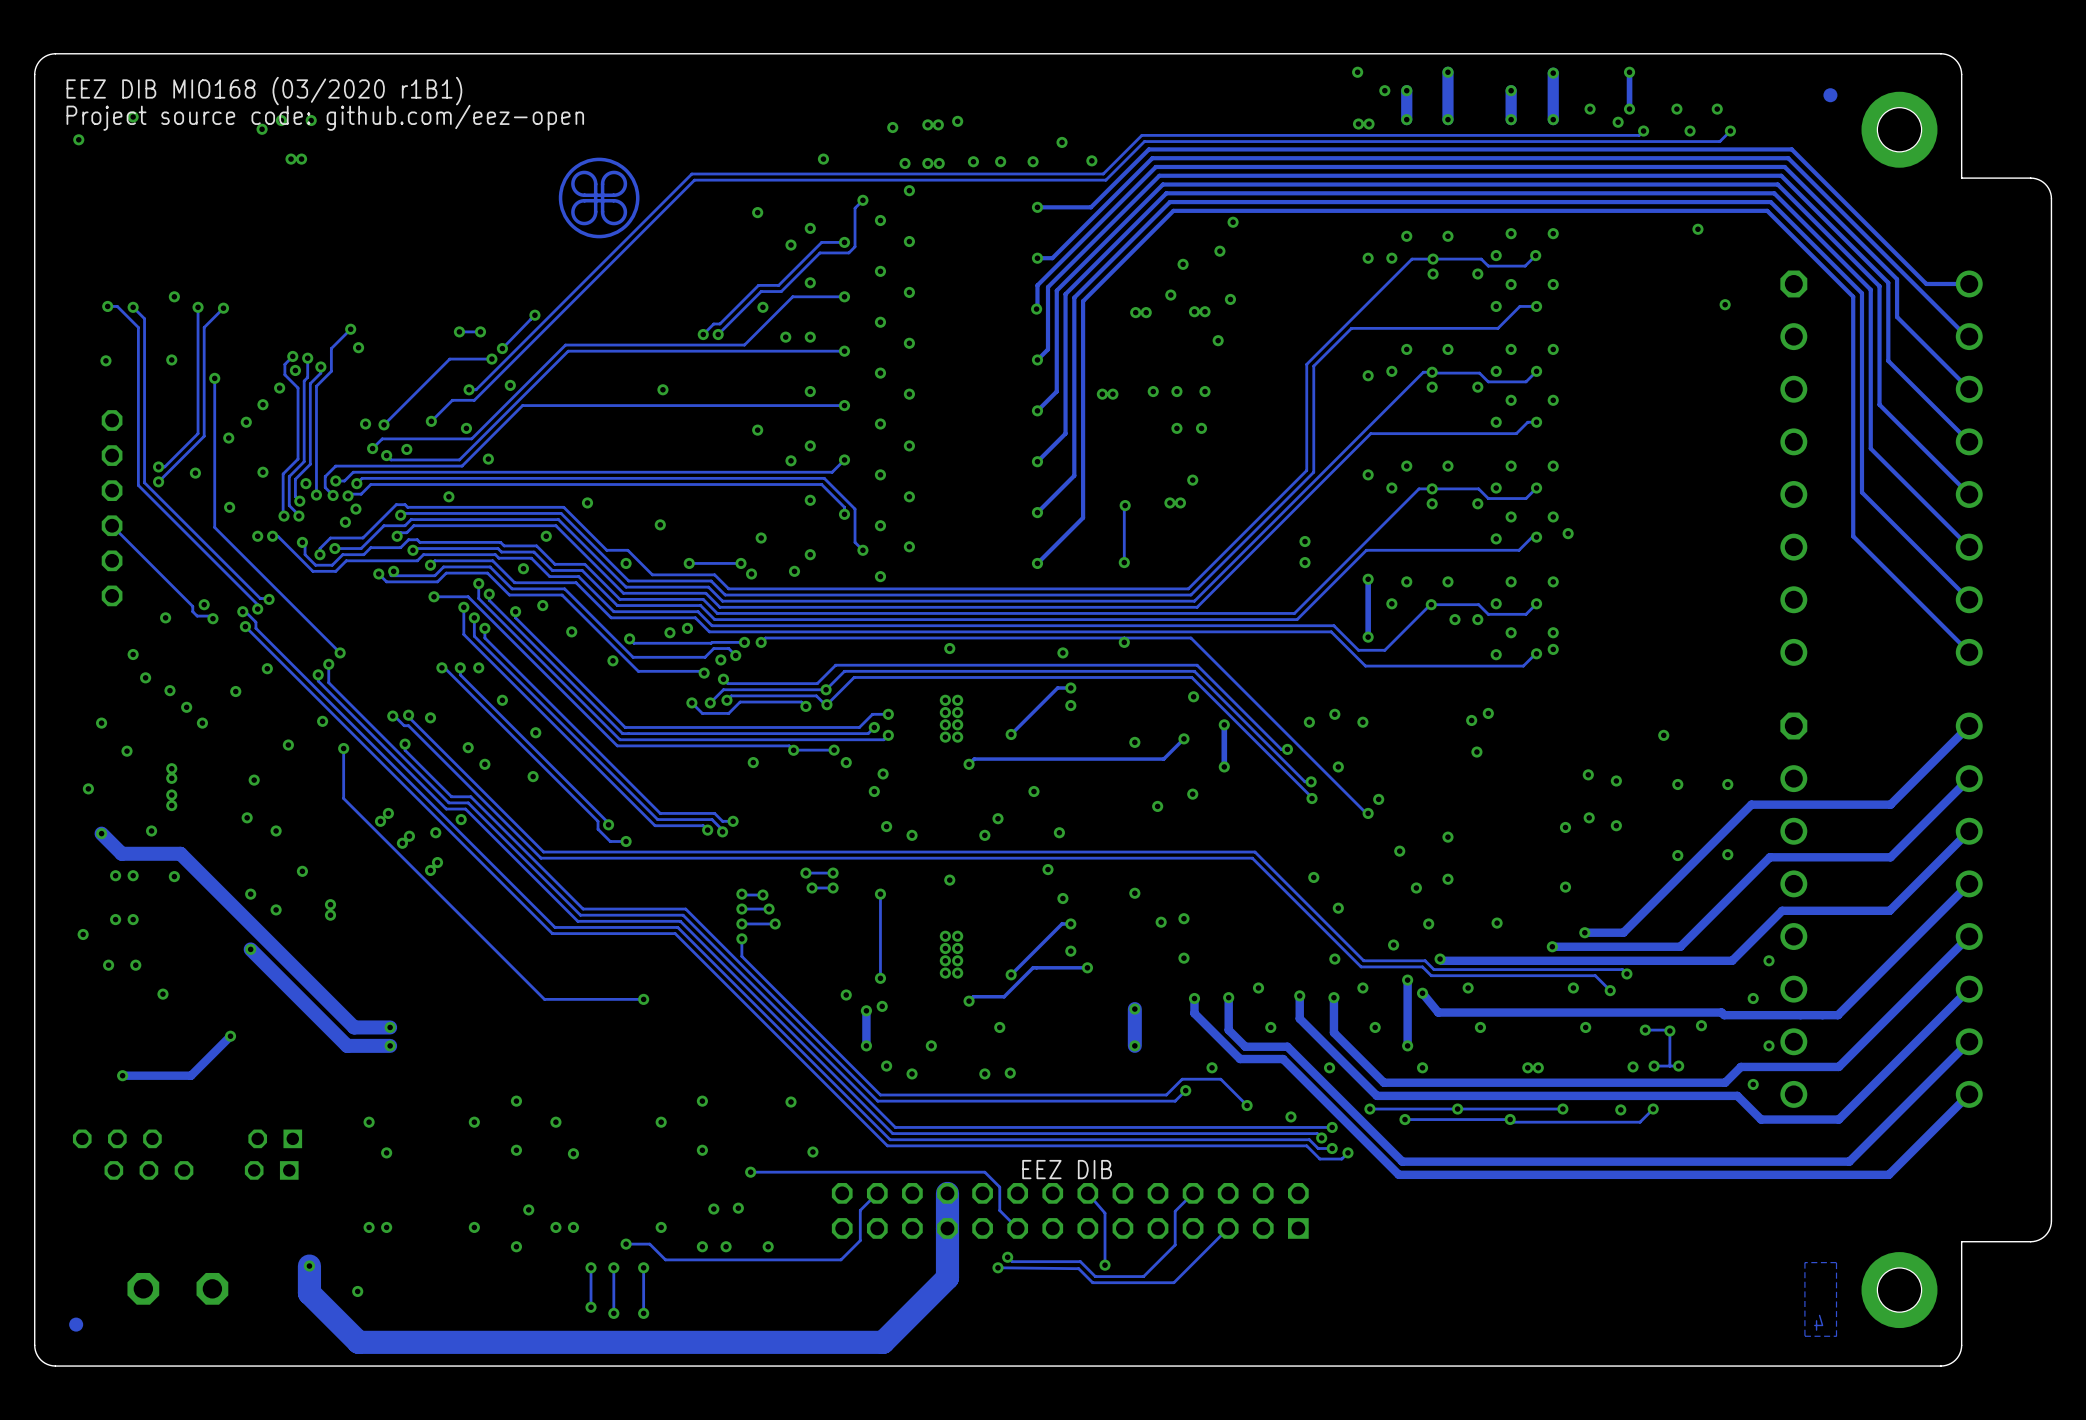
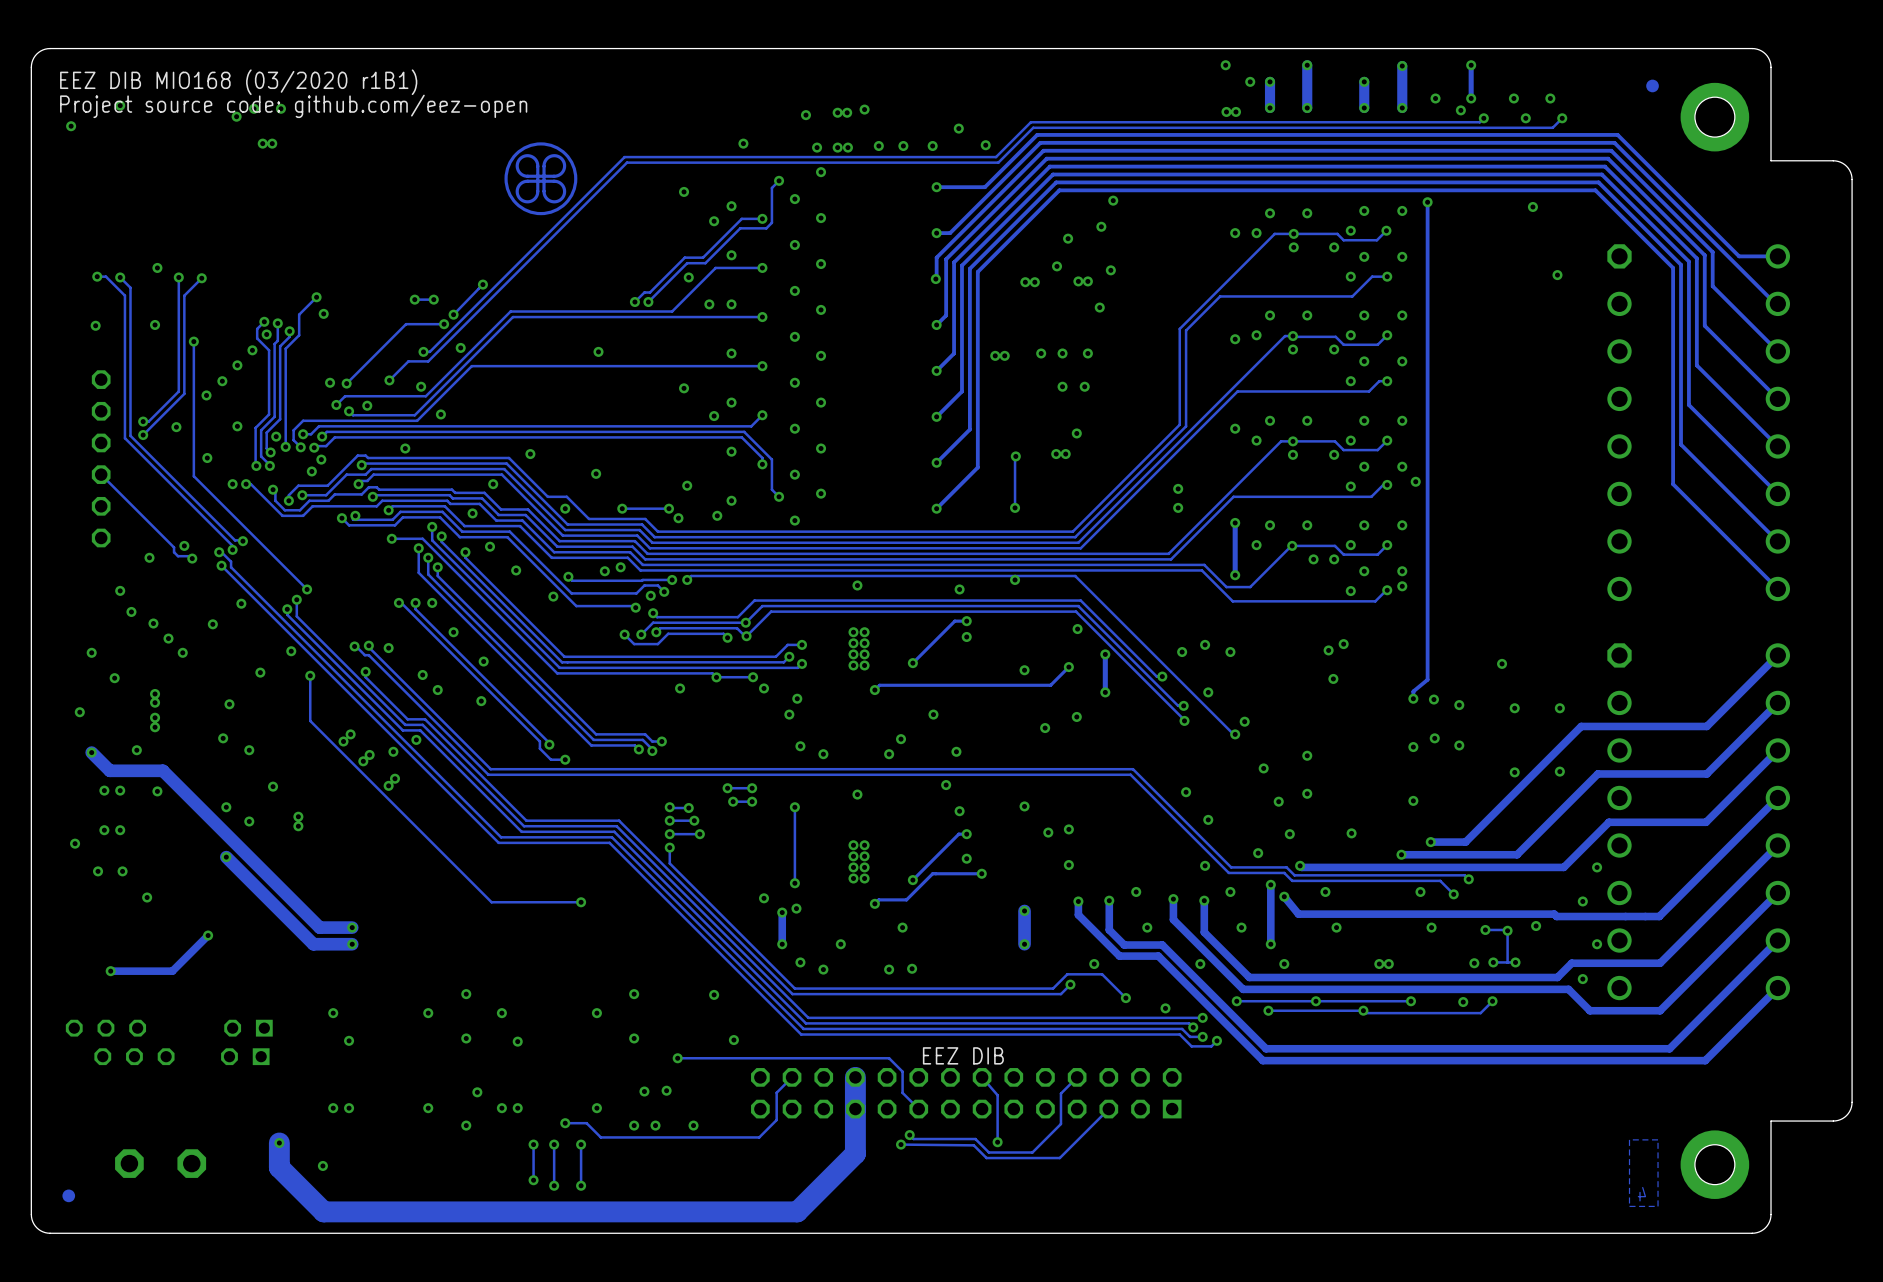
track: none -> (1427, 202) (1427, 679) (1413, 691) (1413, 698)
via: none -> (1427, 202)
via: none -> (1413, 698)

